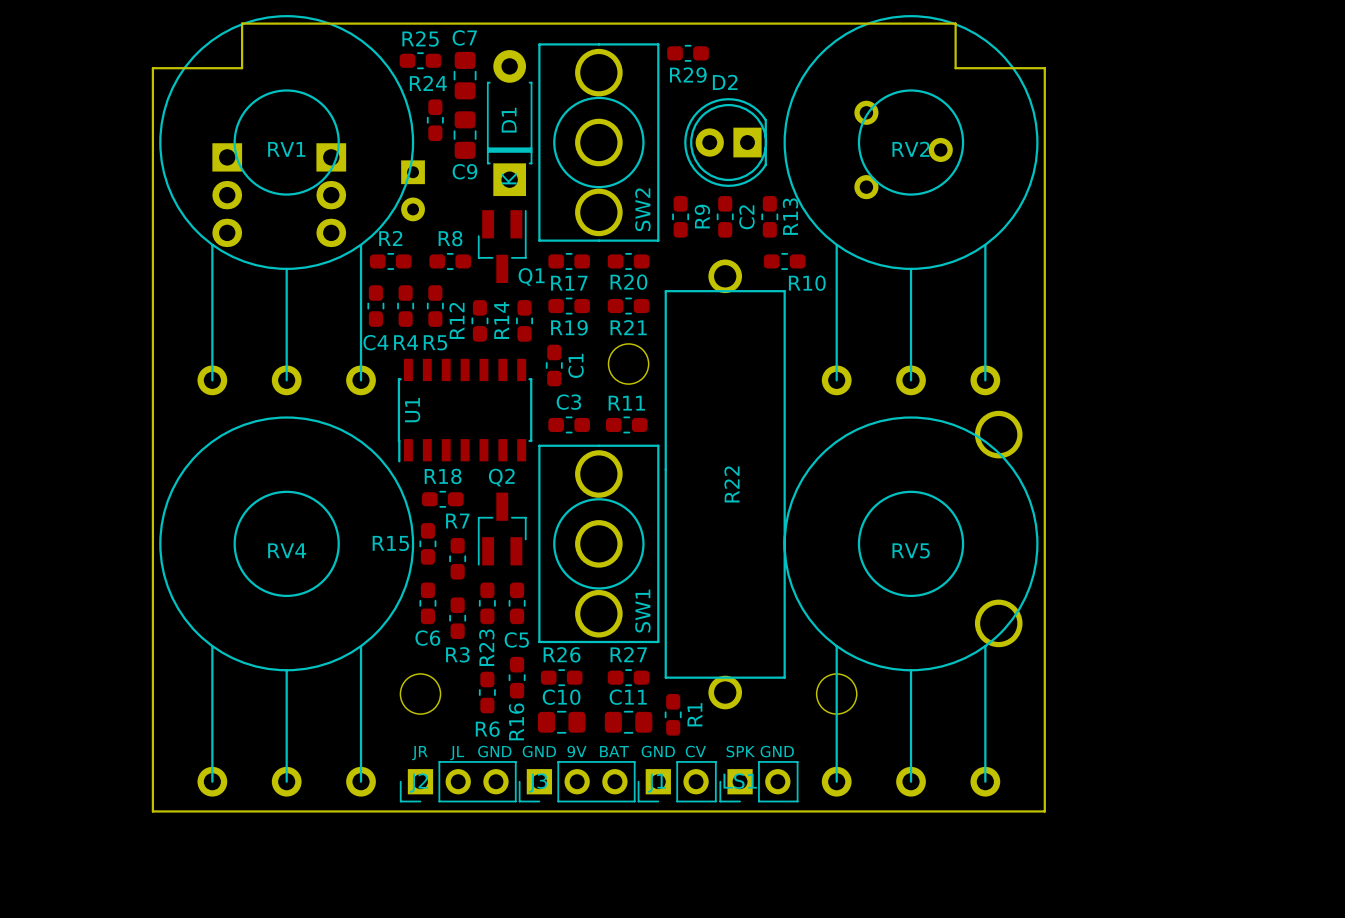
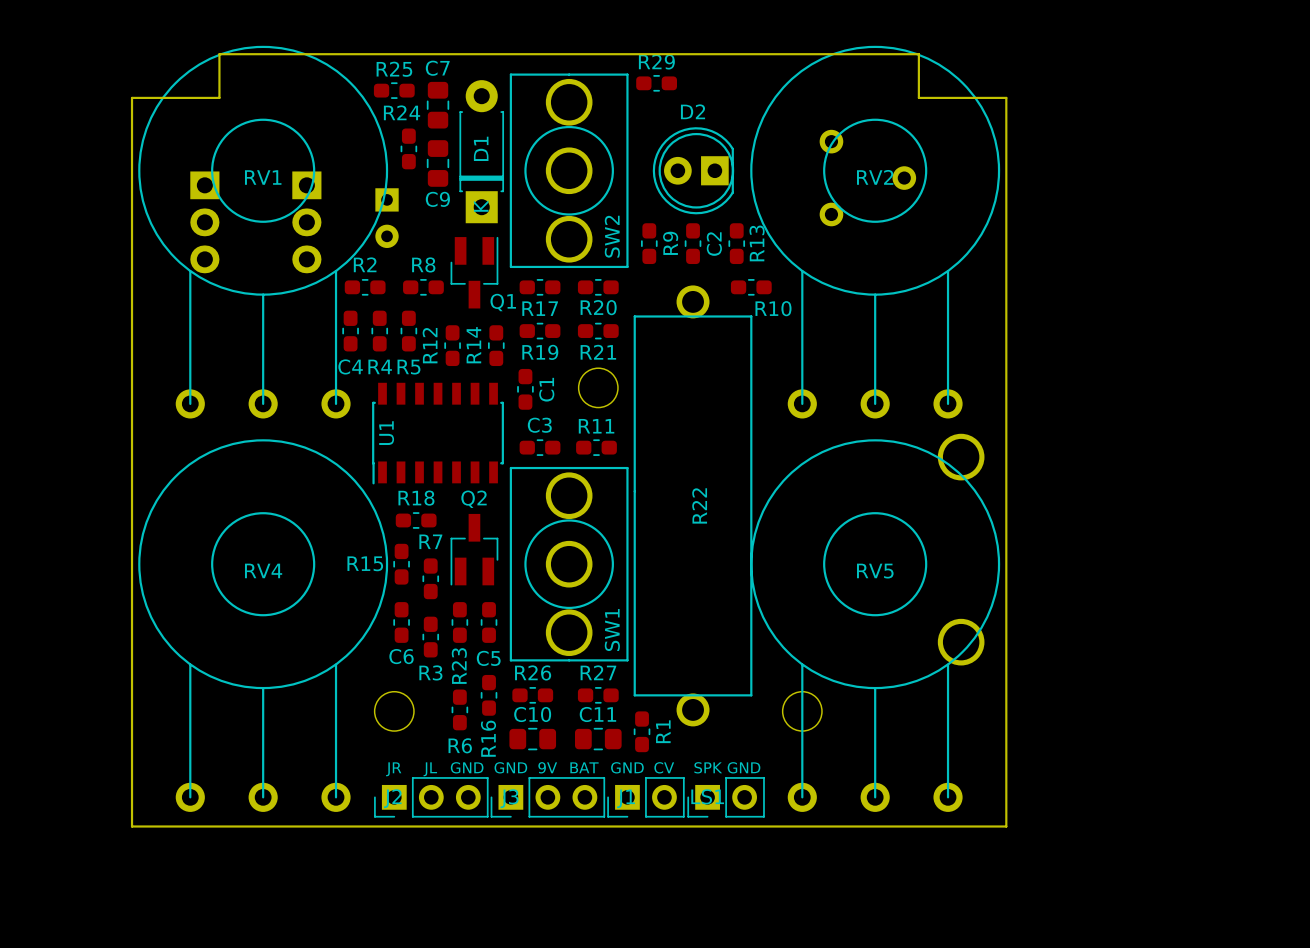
R29 name position: R29 (688, 75) -> R29 (656, 61)

